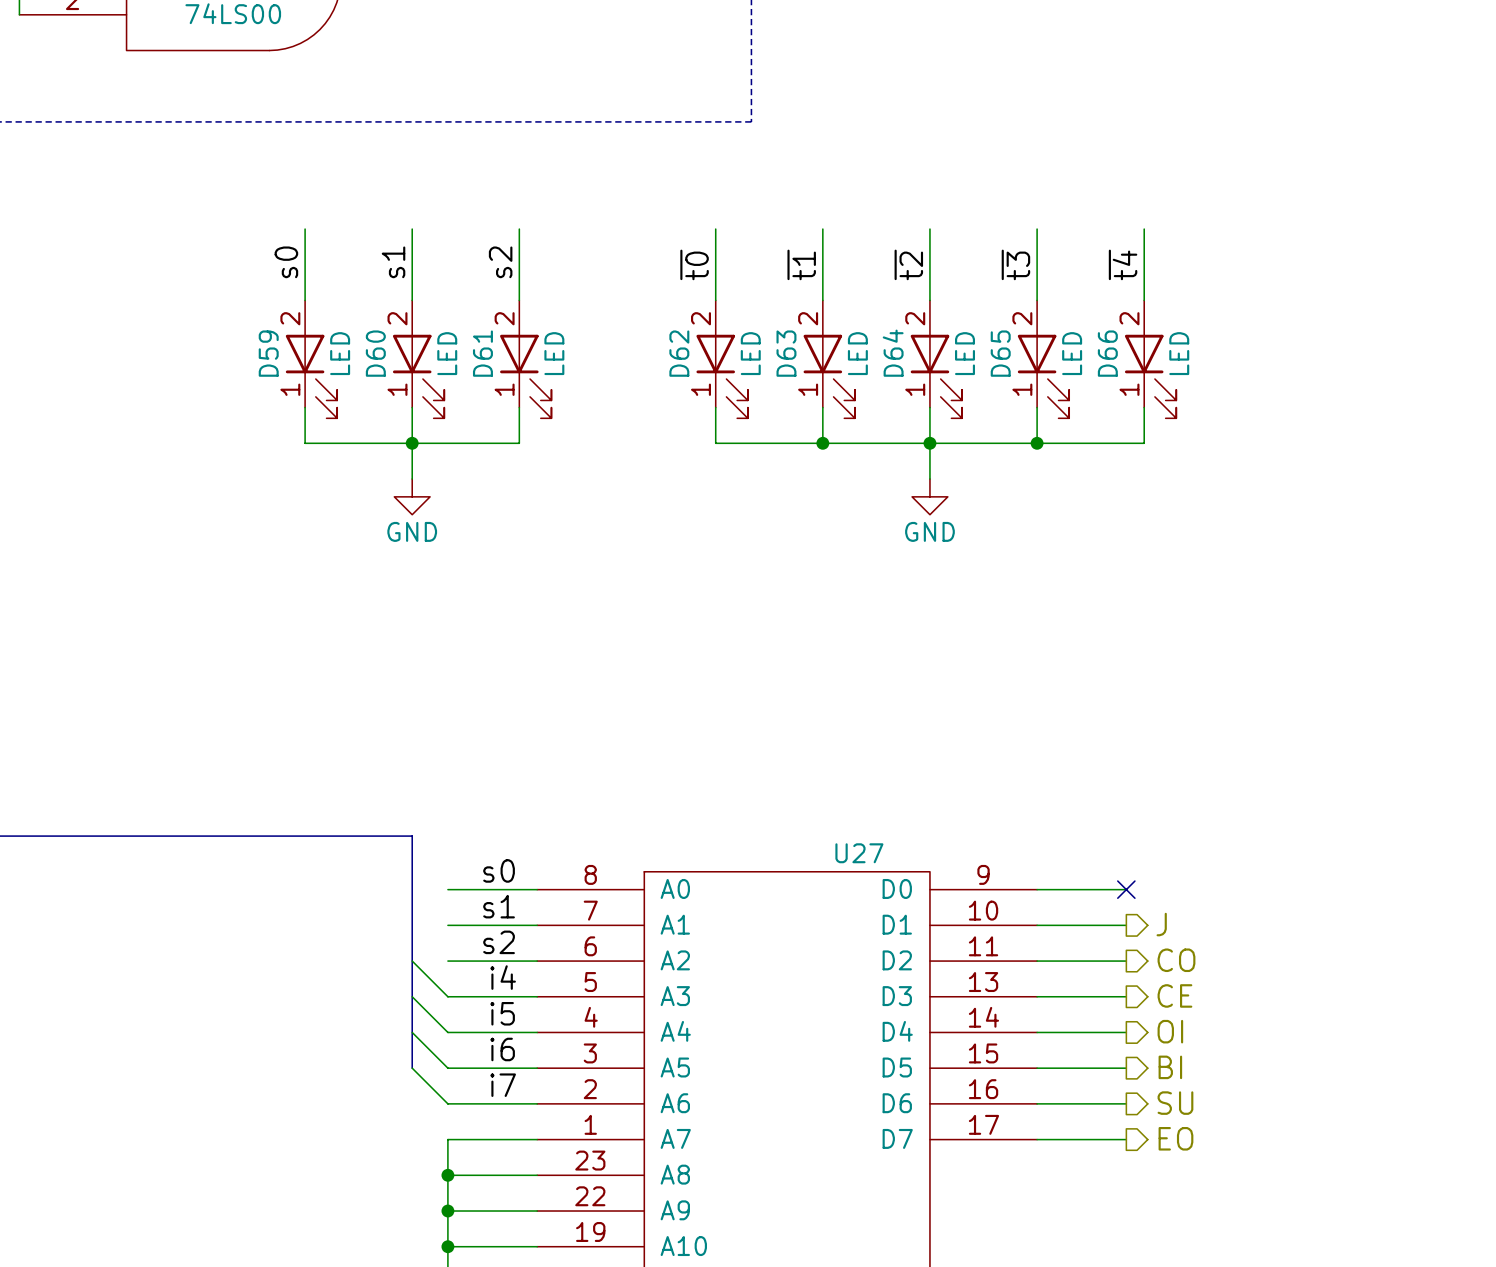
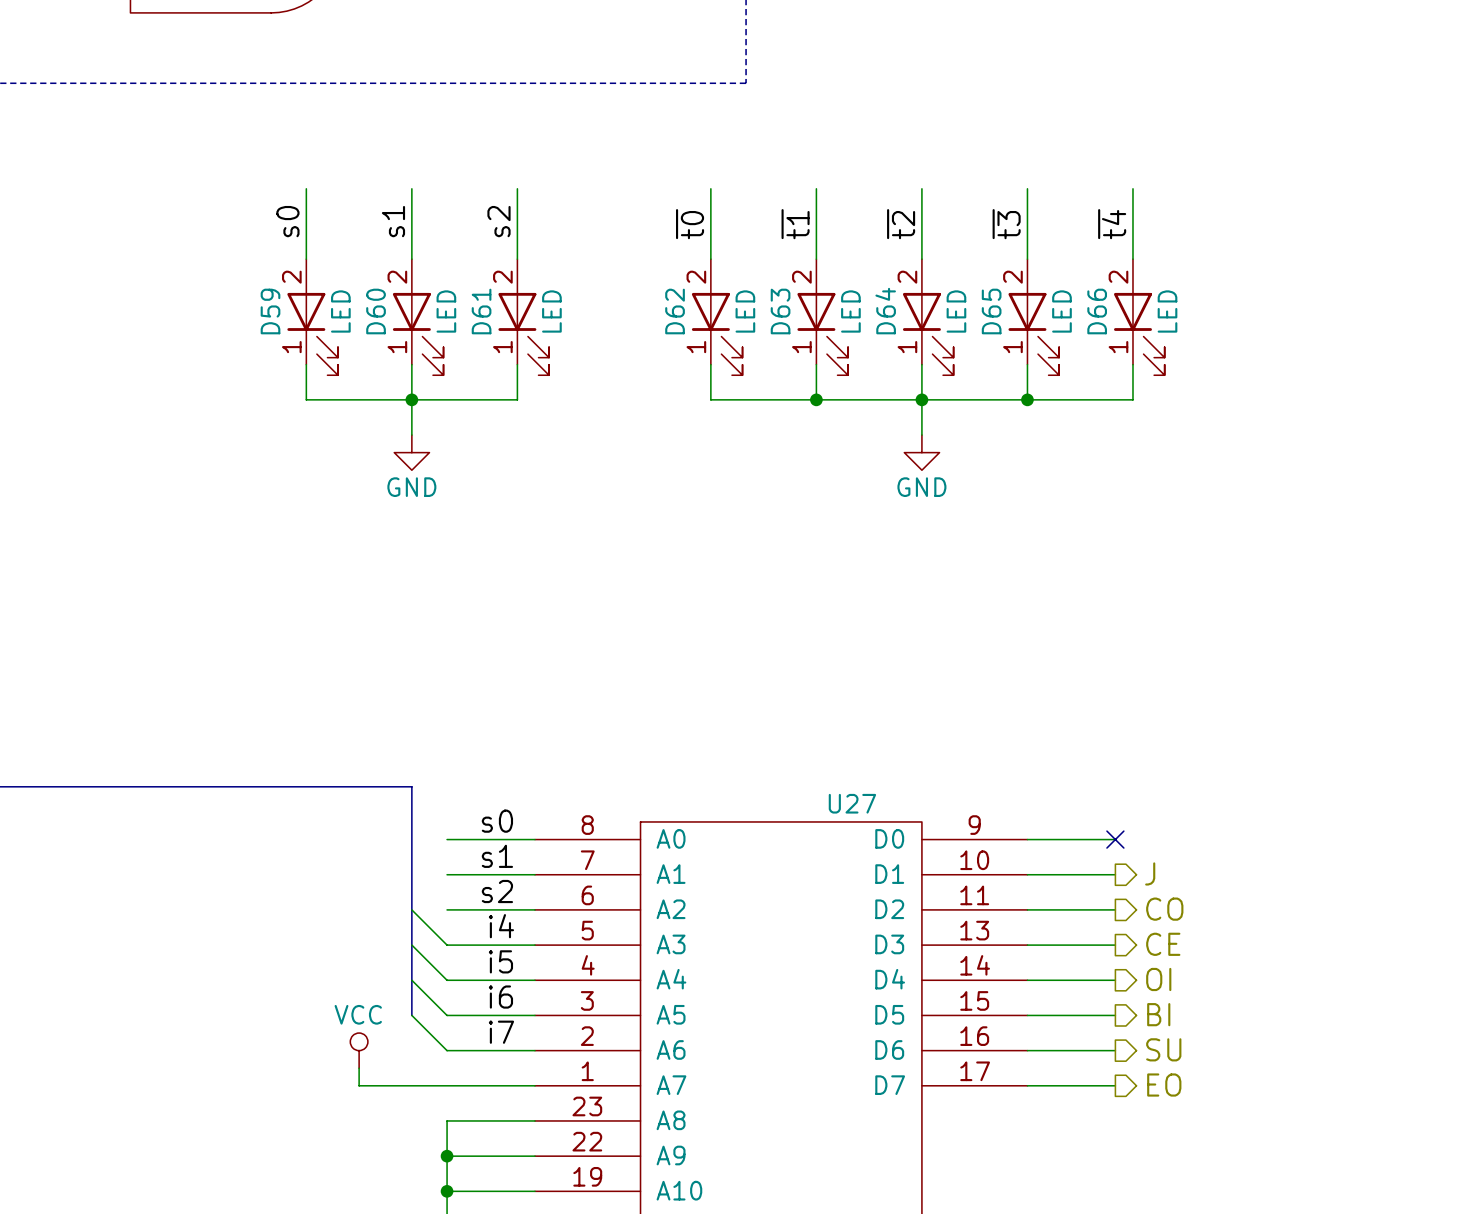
power symbol: none -> VCC (359, 1050)
wire: (447, 1139) (447, 1175) -> (447, 1085) (359, 1085) (359, 1068)
junction: (447, 1175) -> none

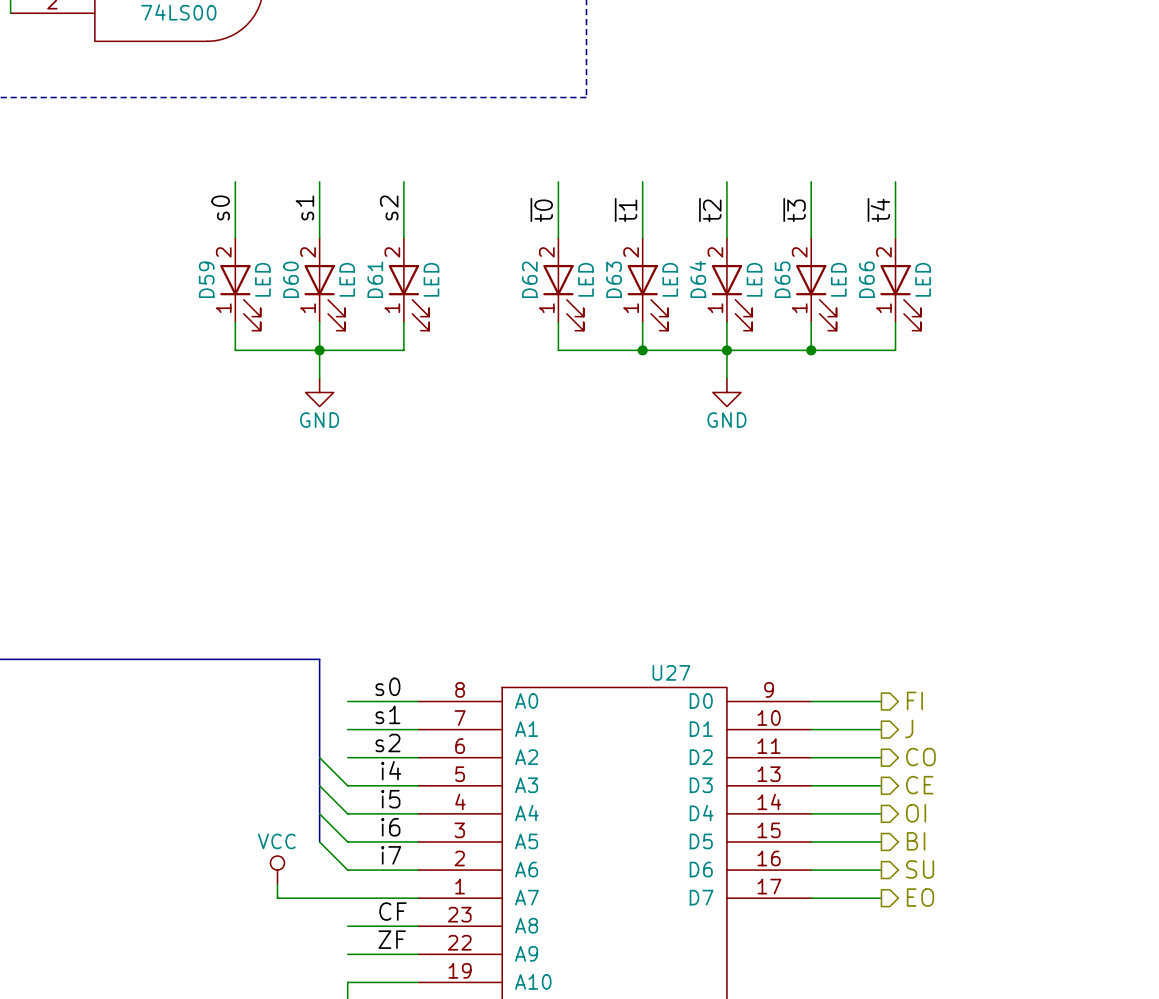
hierarchical label: none -> FI (914, 700)
no-connect mark: (1115, 839) -> none
label: none -> CF (392, 911)
wire: (447, 1120) (447, 1191) -> none
label: none -> ZF (392, 939)
junction: (447, 1156) -> none
junction: (447, 1191) -> none

